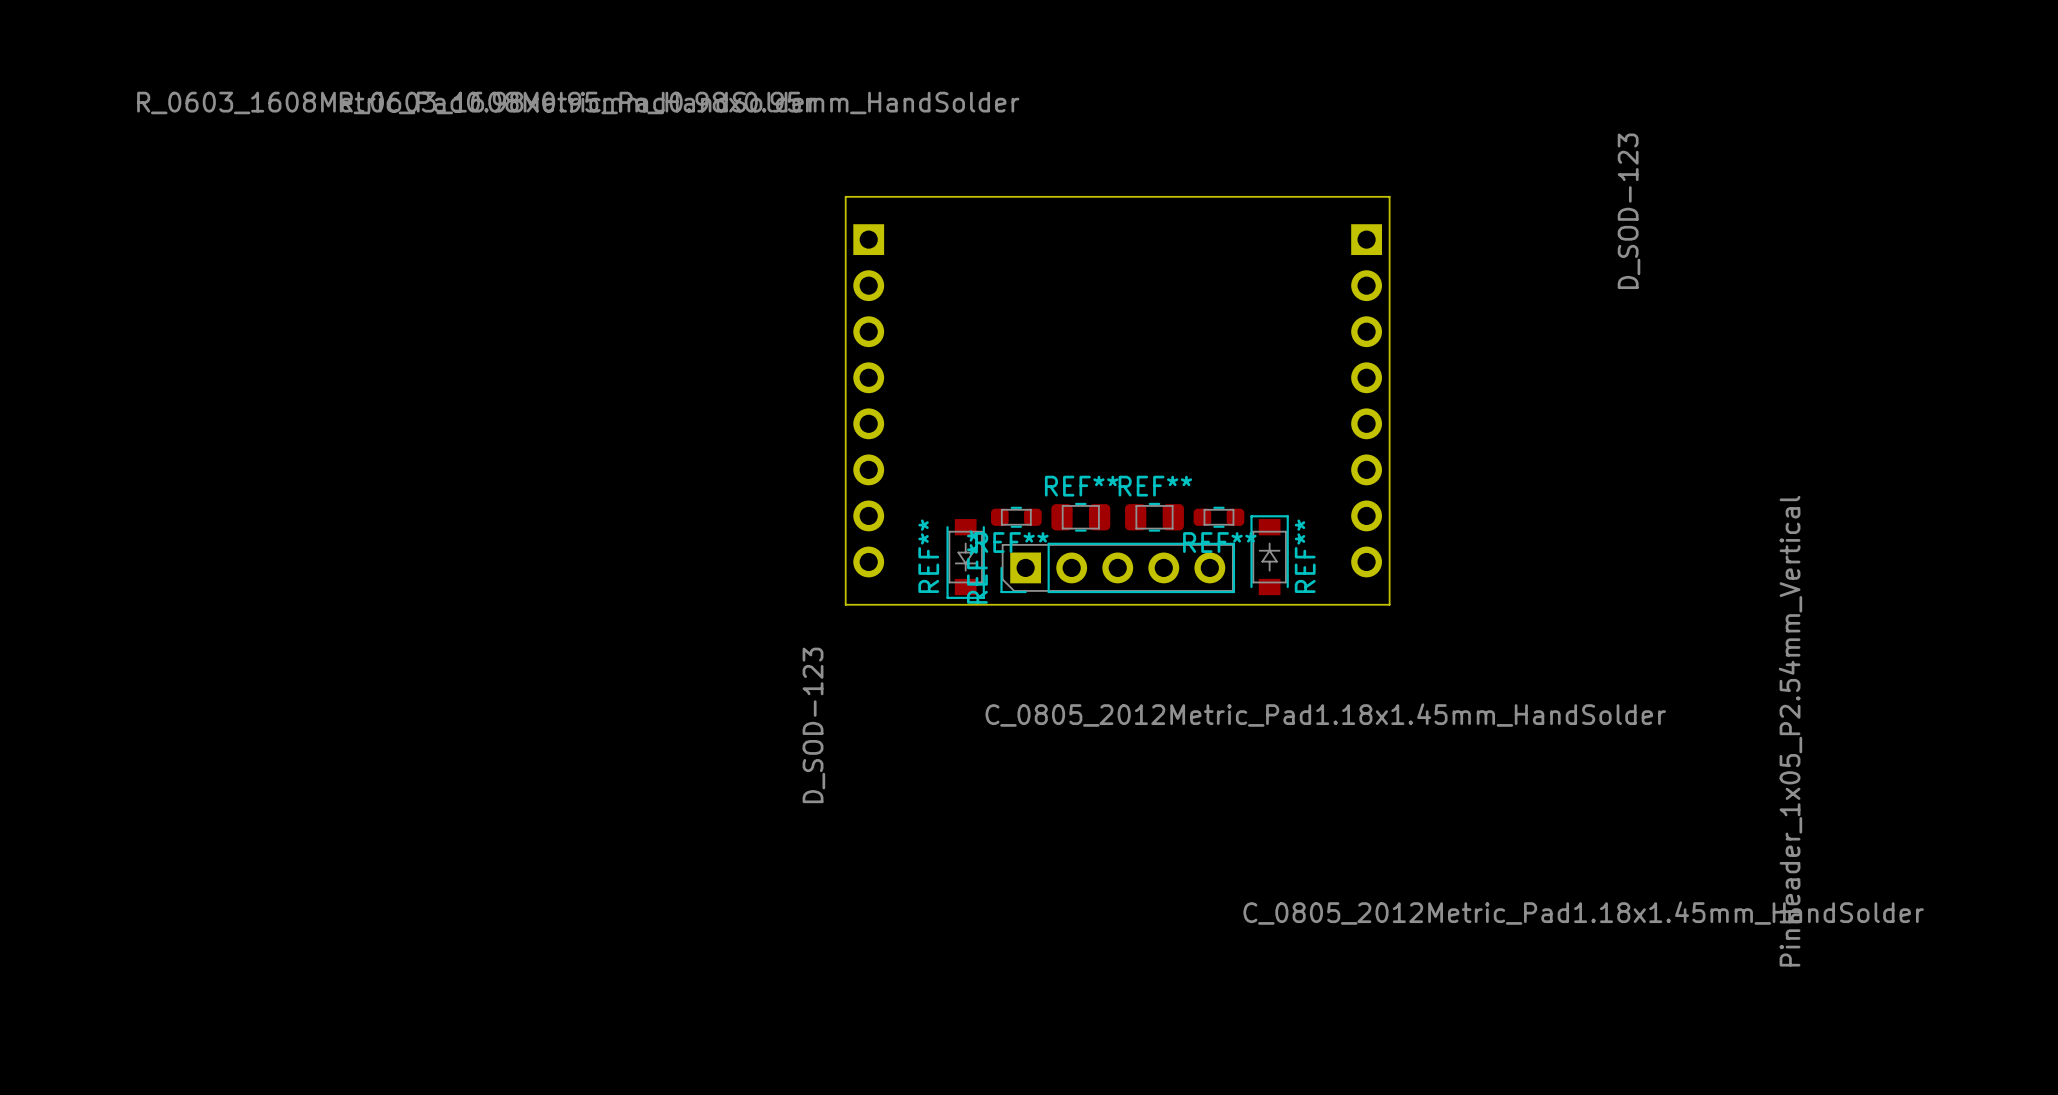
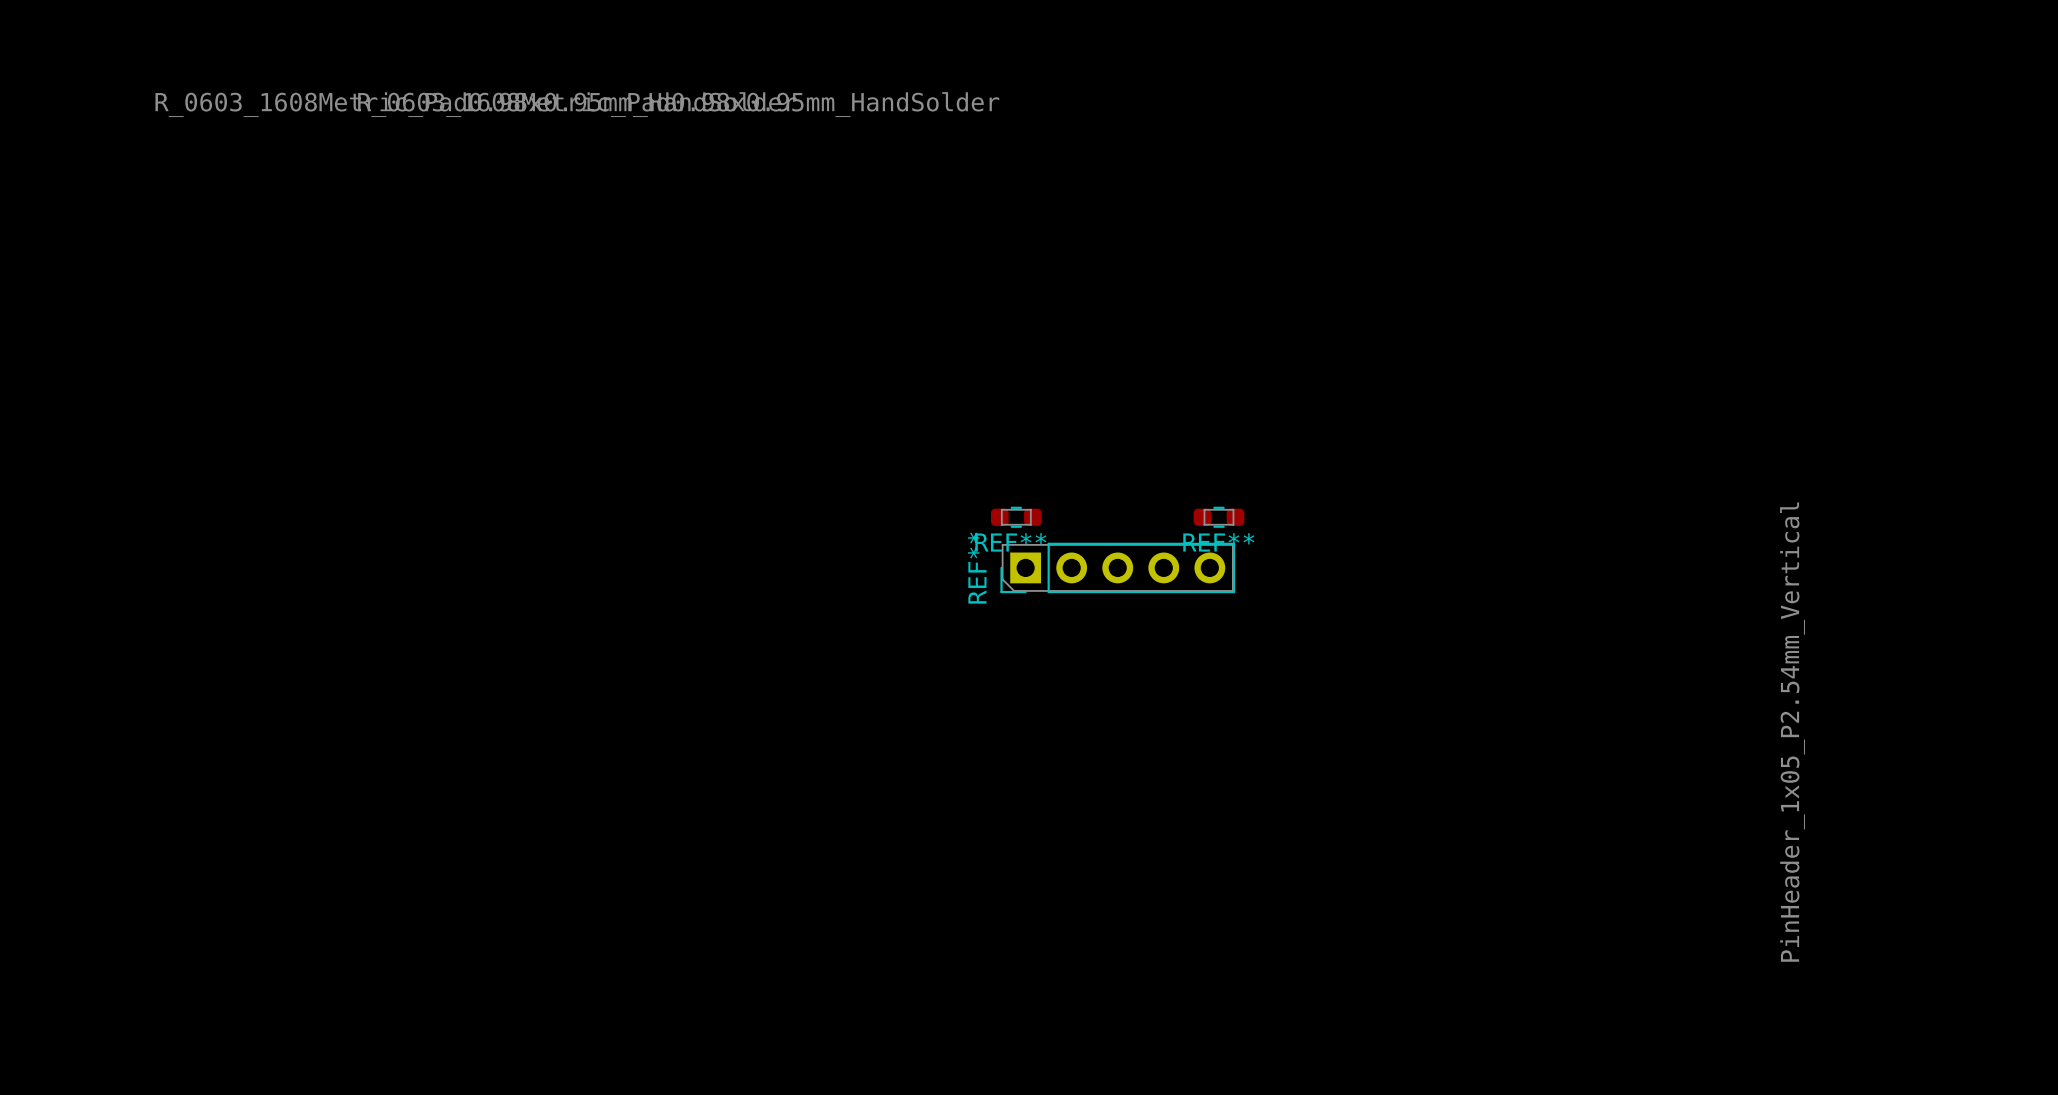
board edge: (845, 196) (1389, 196) (1389, 604) (845, 604) (845, 196) -> none
part: (868, 400) -> none
part: (1366, 400) -> none
REF**: C_0805_2012Metric_Pad1.18x1.45mm_HandSolder (1080, 517) -> none
REF**: C_0805_2012Metric_Pad1.18x1.45mm_HandSolder (1154, 517) -> none
REF**: D_SOD-123 (1269, 555) -> none
REF**: D_SOD-123 (965, 558) -> none

